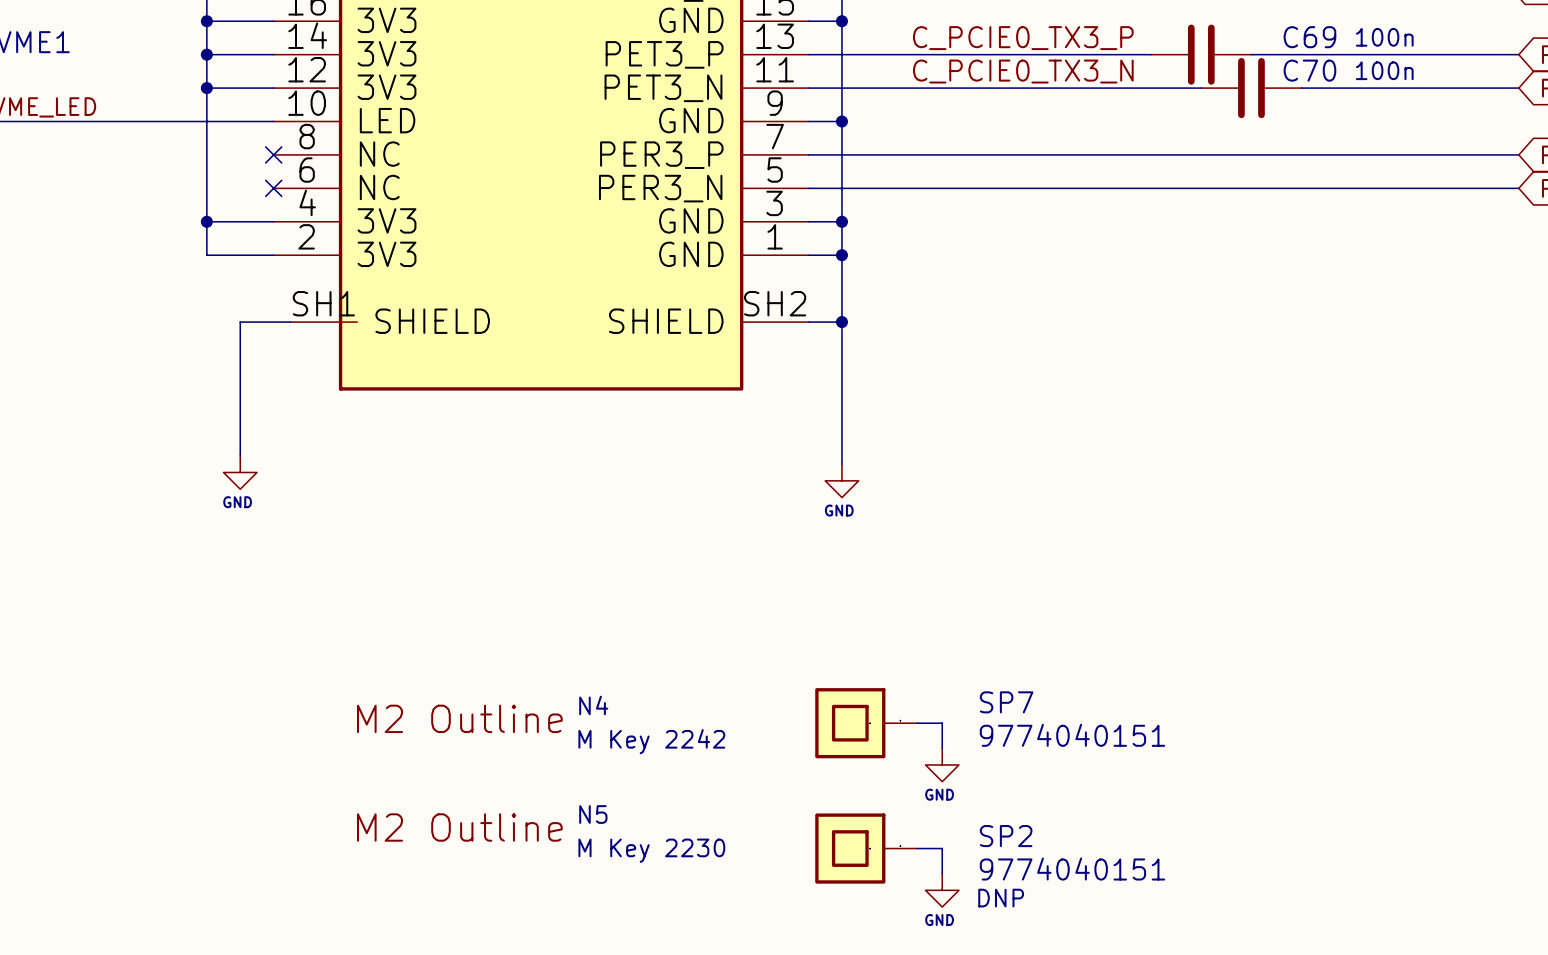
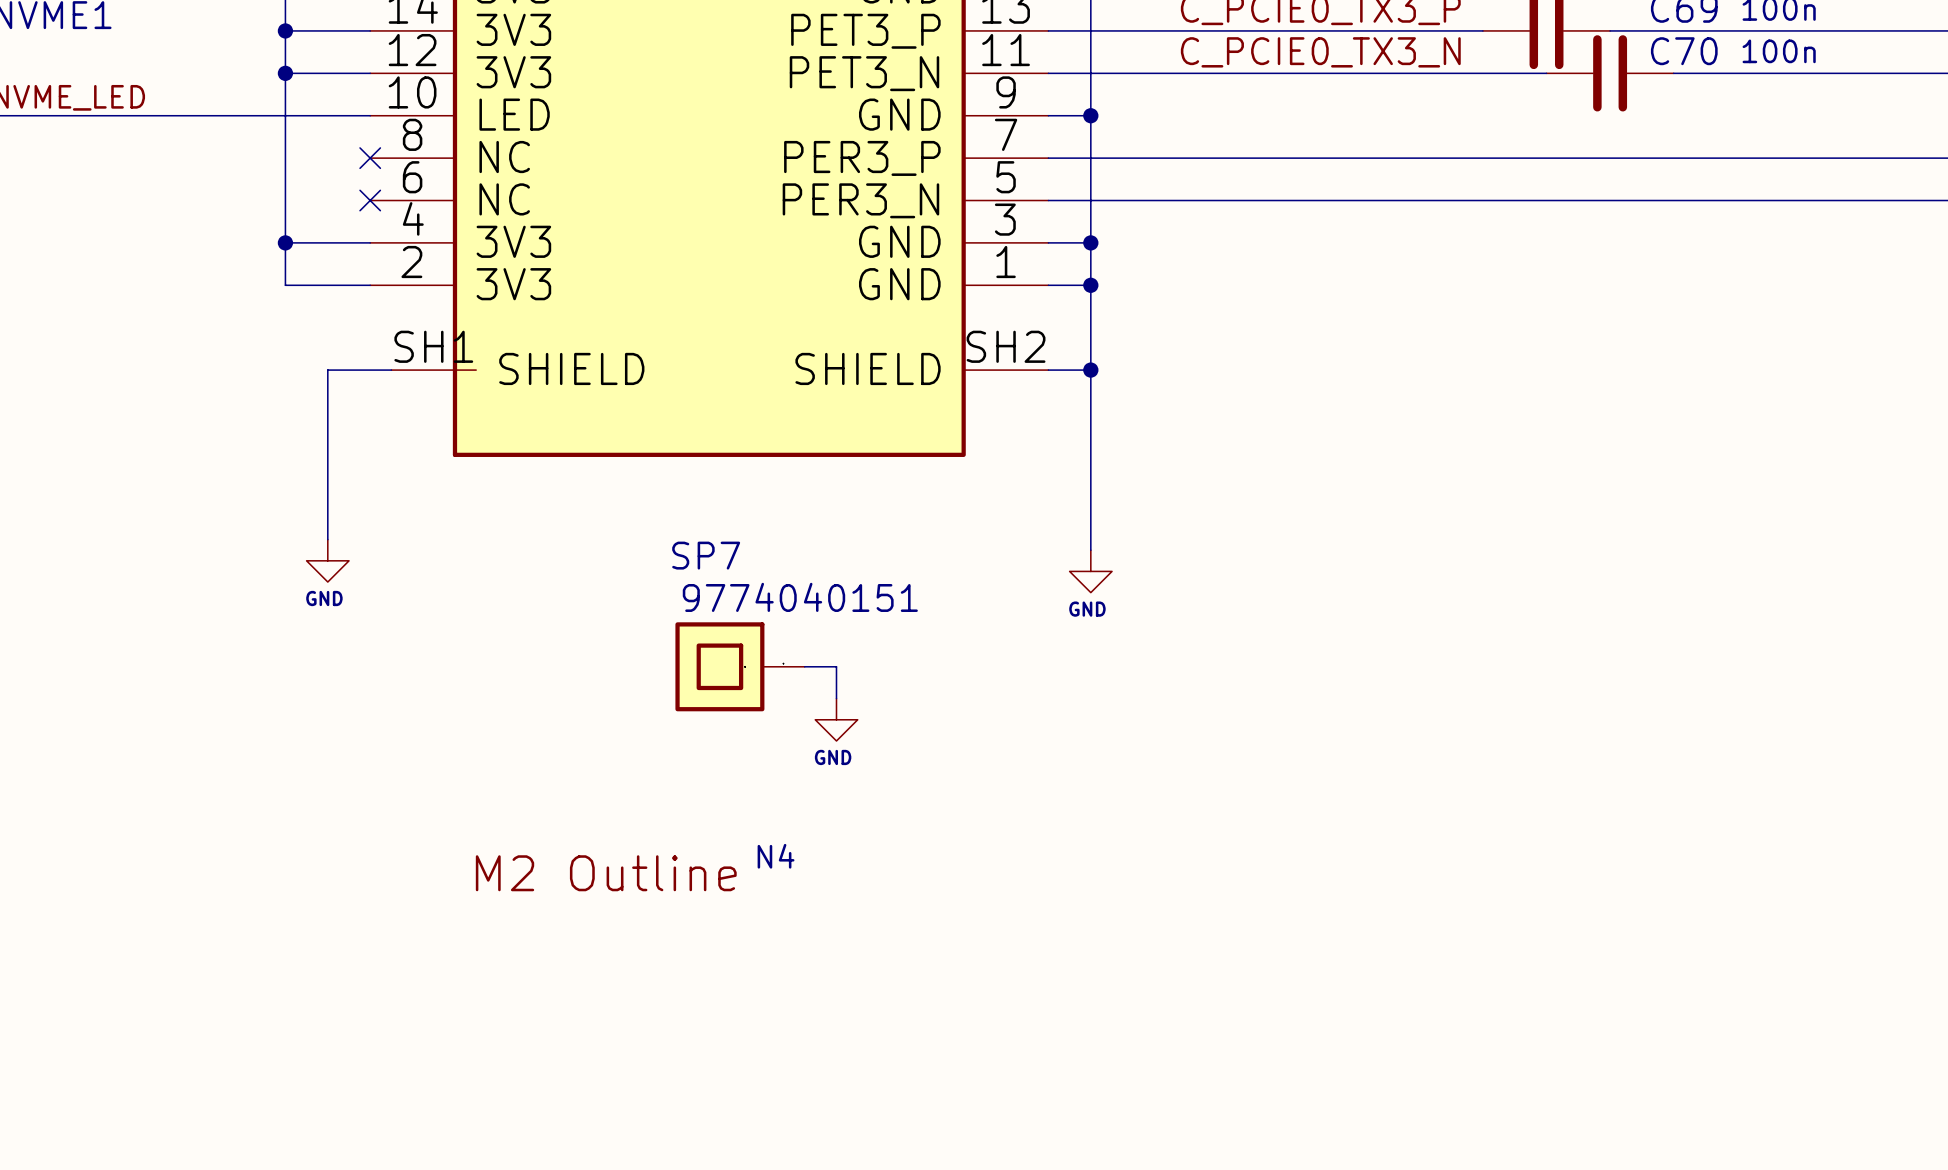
wire: none -> (804, 666) (836, 666) (836, 698)
power symbol: none -> GND (836, 719)
SP7 name position: SP7 (1006, 702) -> SP7 (706, 555)
SP7 position: (866, 723) -> (740, 666)
wire: (917, 723) (942, 723) (942, 748) -> none
SP7 value position: 9774040151 (1072, 735) -> 9774040151 (800, 597)
N4 value: M Key 2242 (651, 741) -> none
power symbol: GND (942, 764) -> none
N5: M Key 2230 (541, 833) -> none
SP2: 9774040151 (866, 848) -> none
wire: (917, 848) (942, 848) (942, 873) -> none
power symbol: GND (942, 890) -> none

